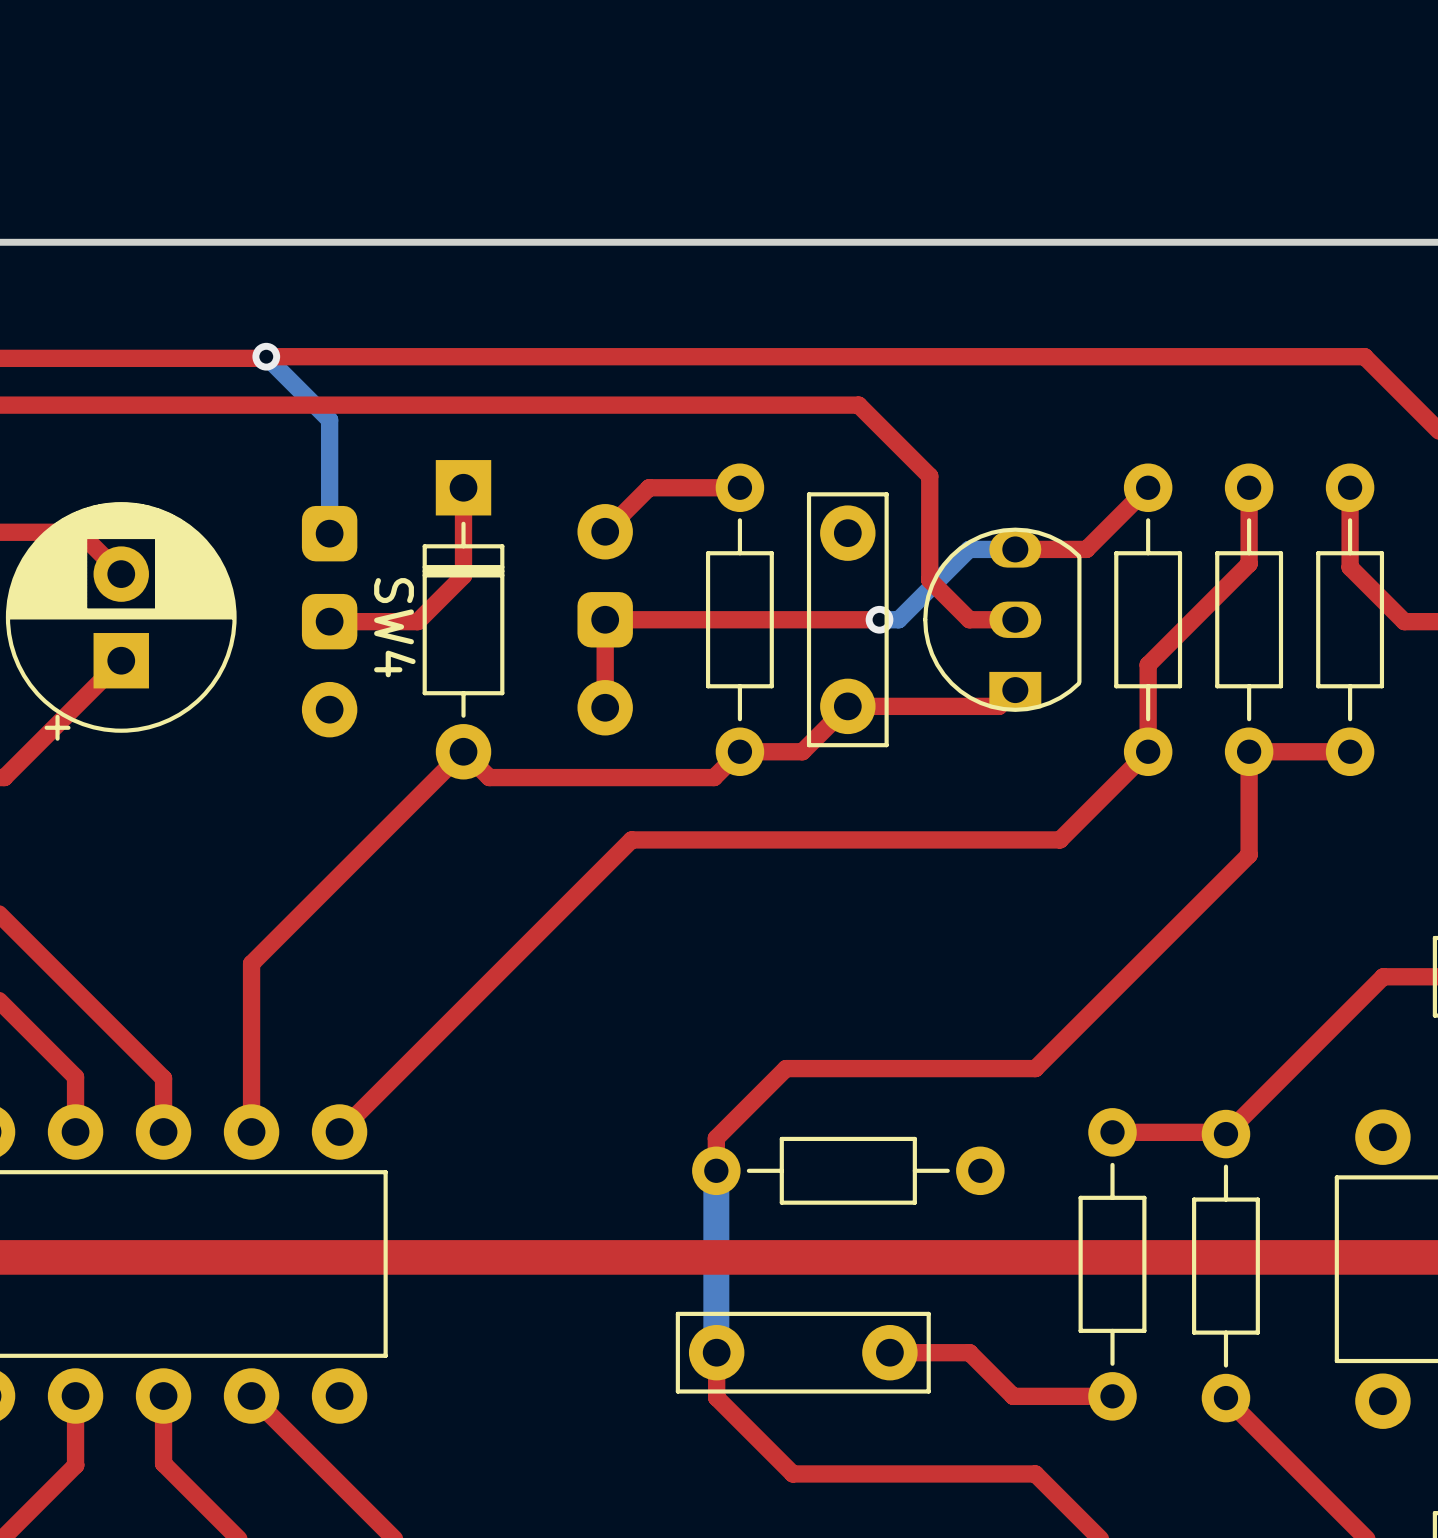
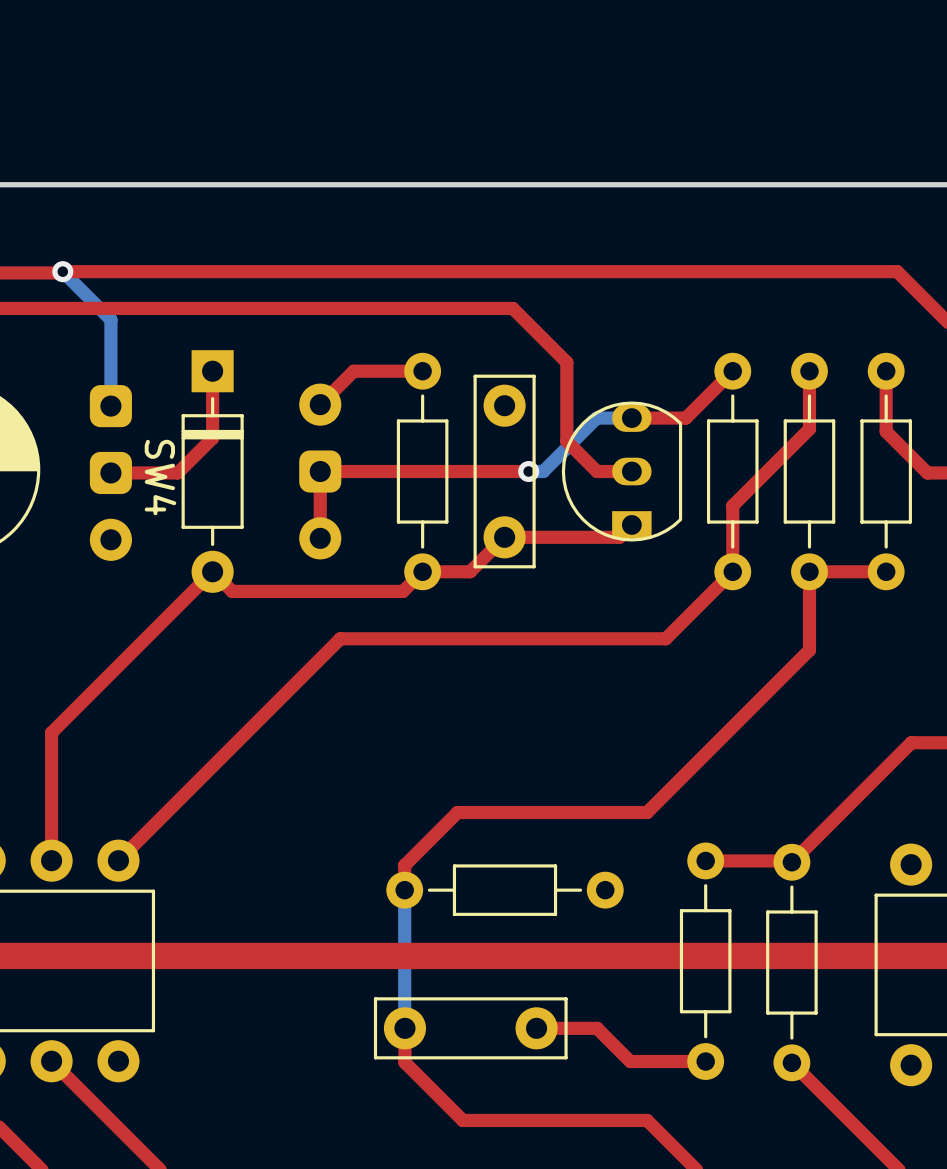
bottom track width: thick (716, 1170) (716, 1352) -> thin (404, 890) (404, 1028)

